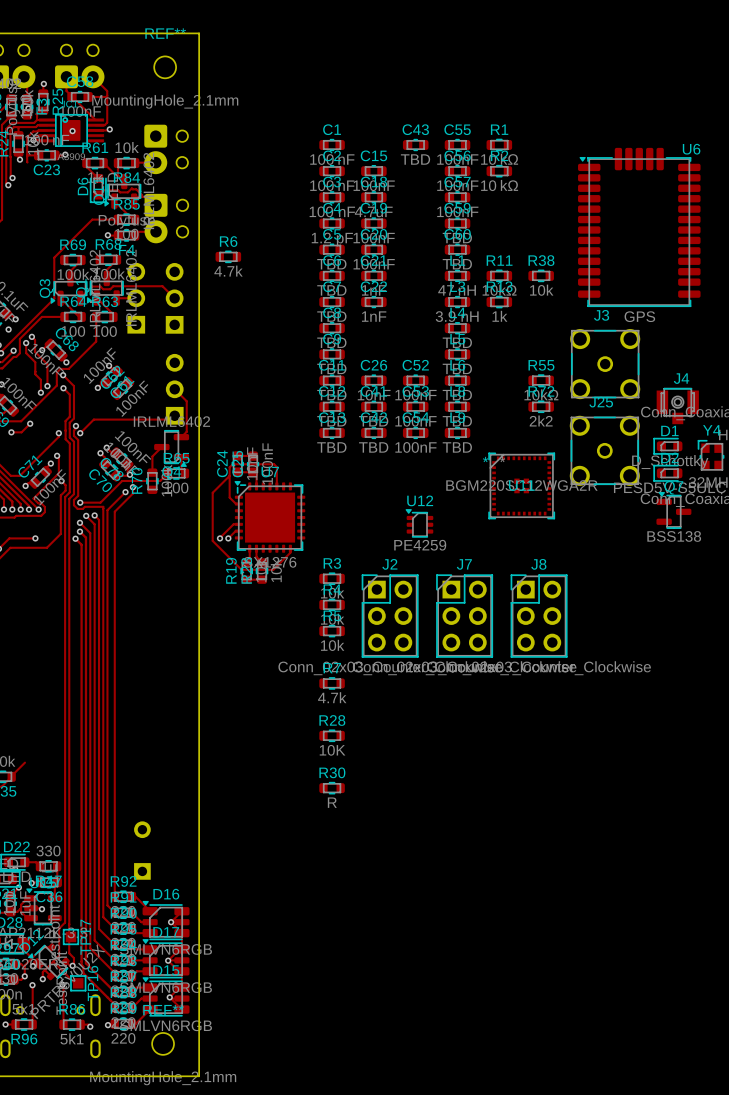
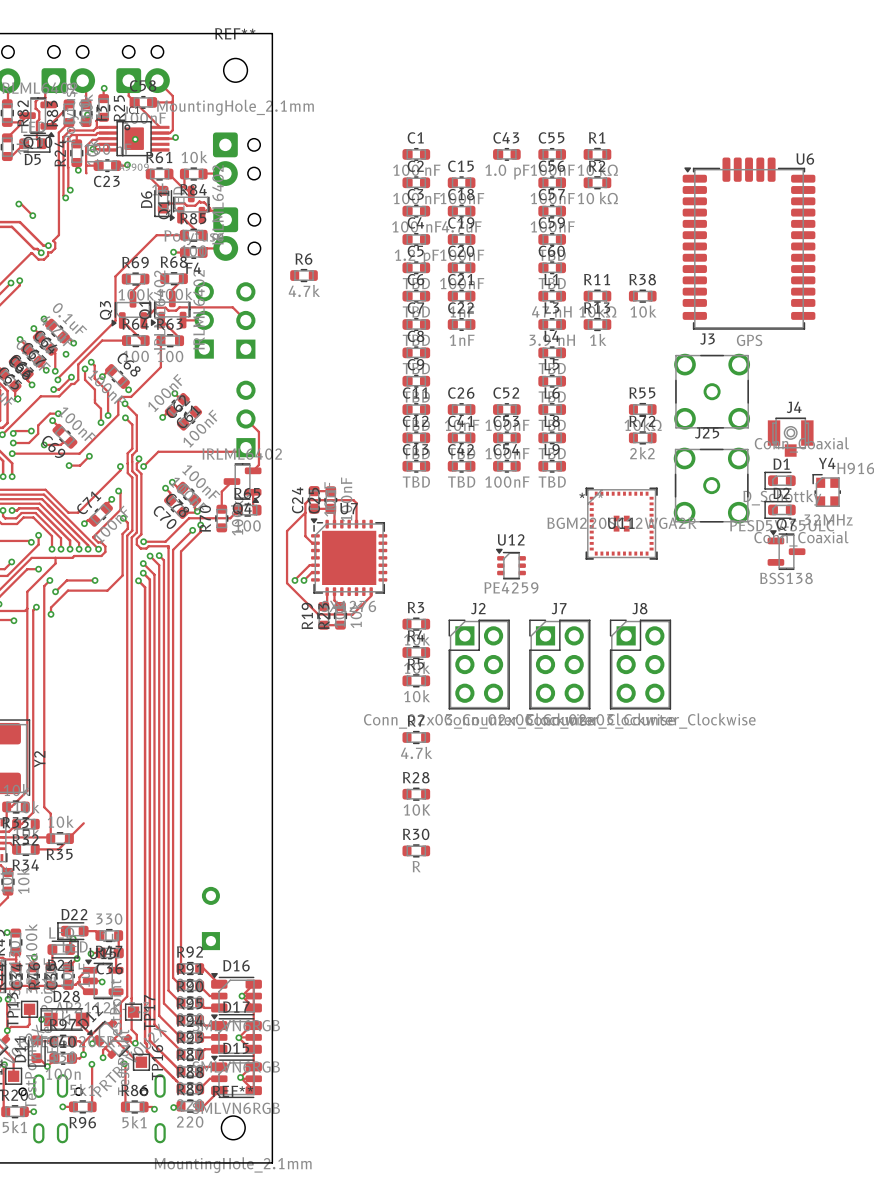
C43 value: TBD (415, 159) -> 1.0 pF (507, 172)

